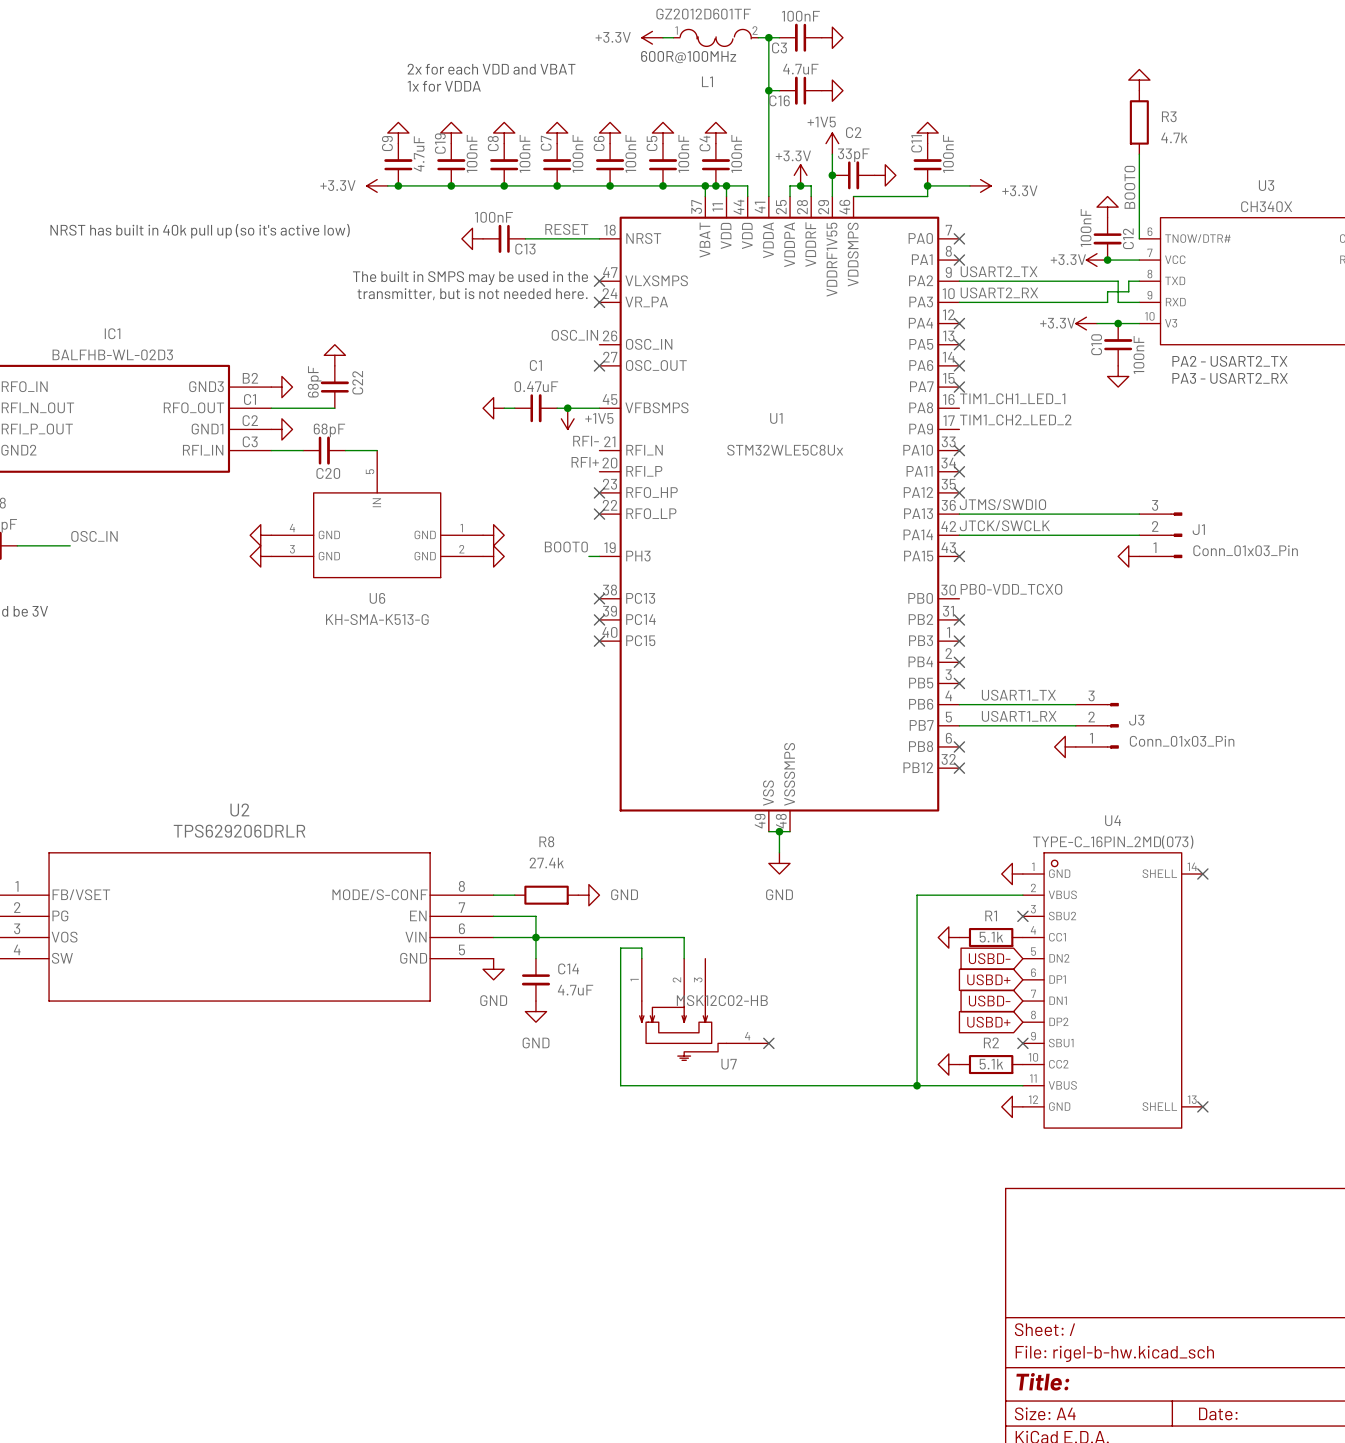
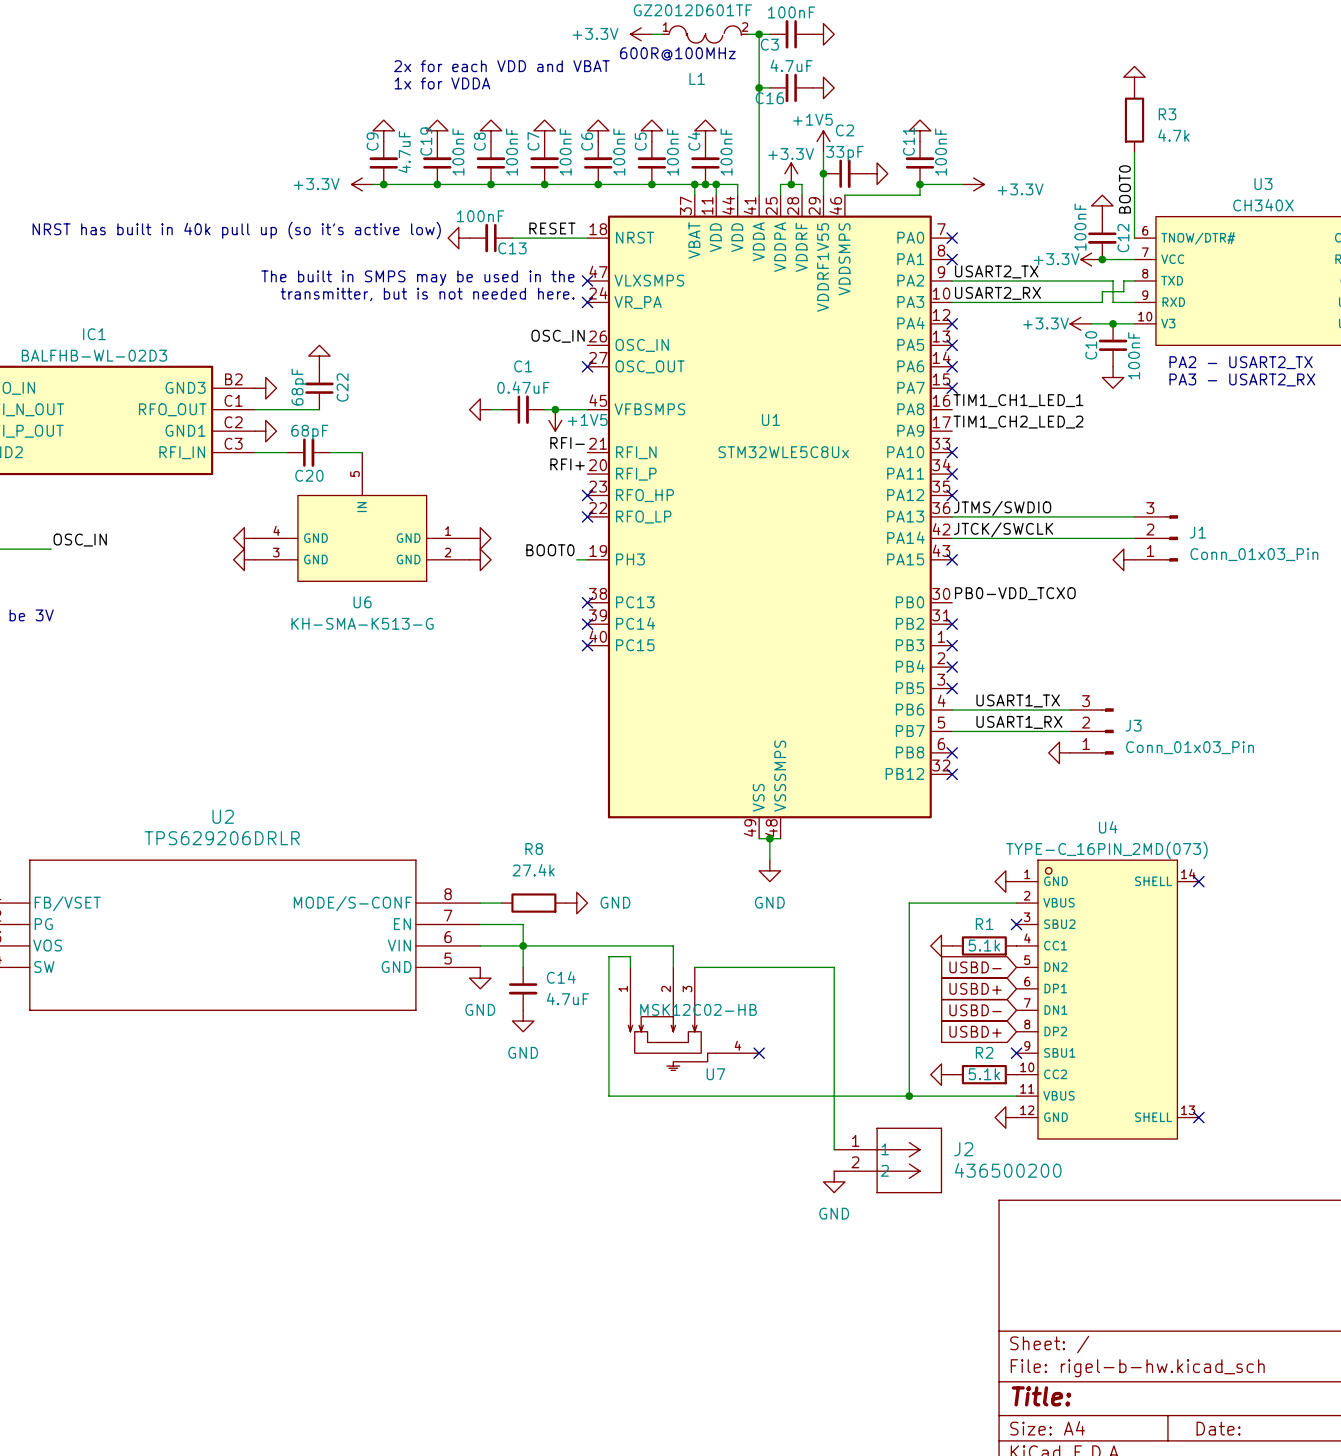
wire: none -> (694, 967) (834, 967) (834, 1149)
J2: none -> 436500200 (888, 1160)
power symbol: none -> GND (834, 1181)

